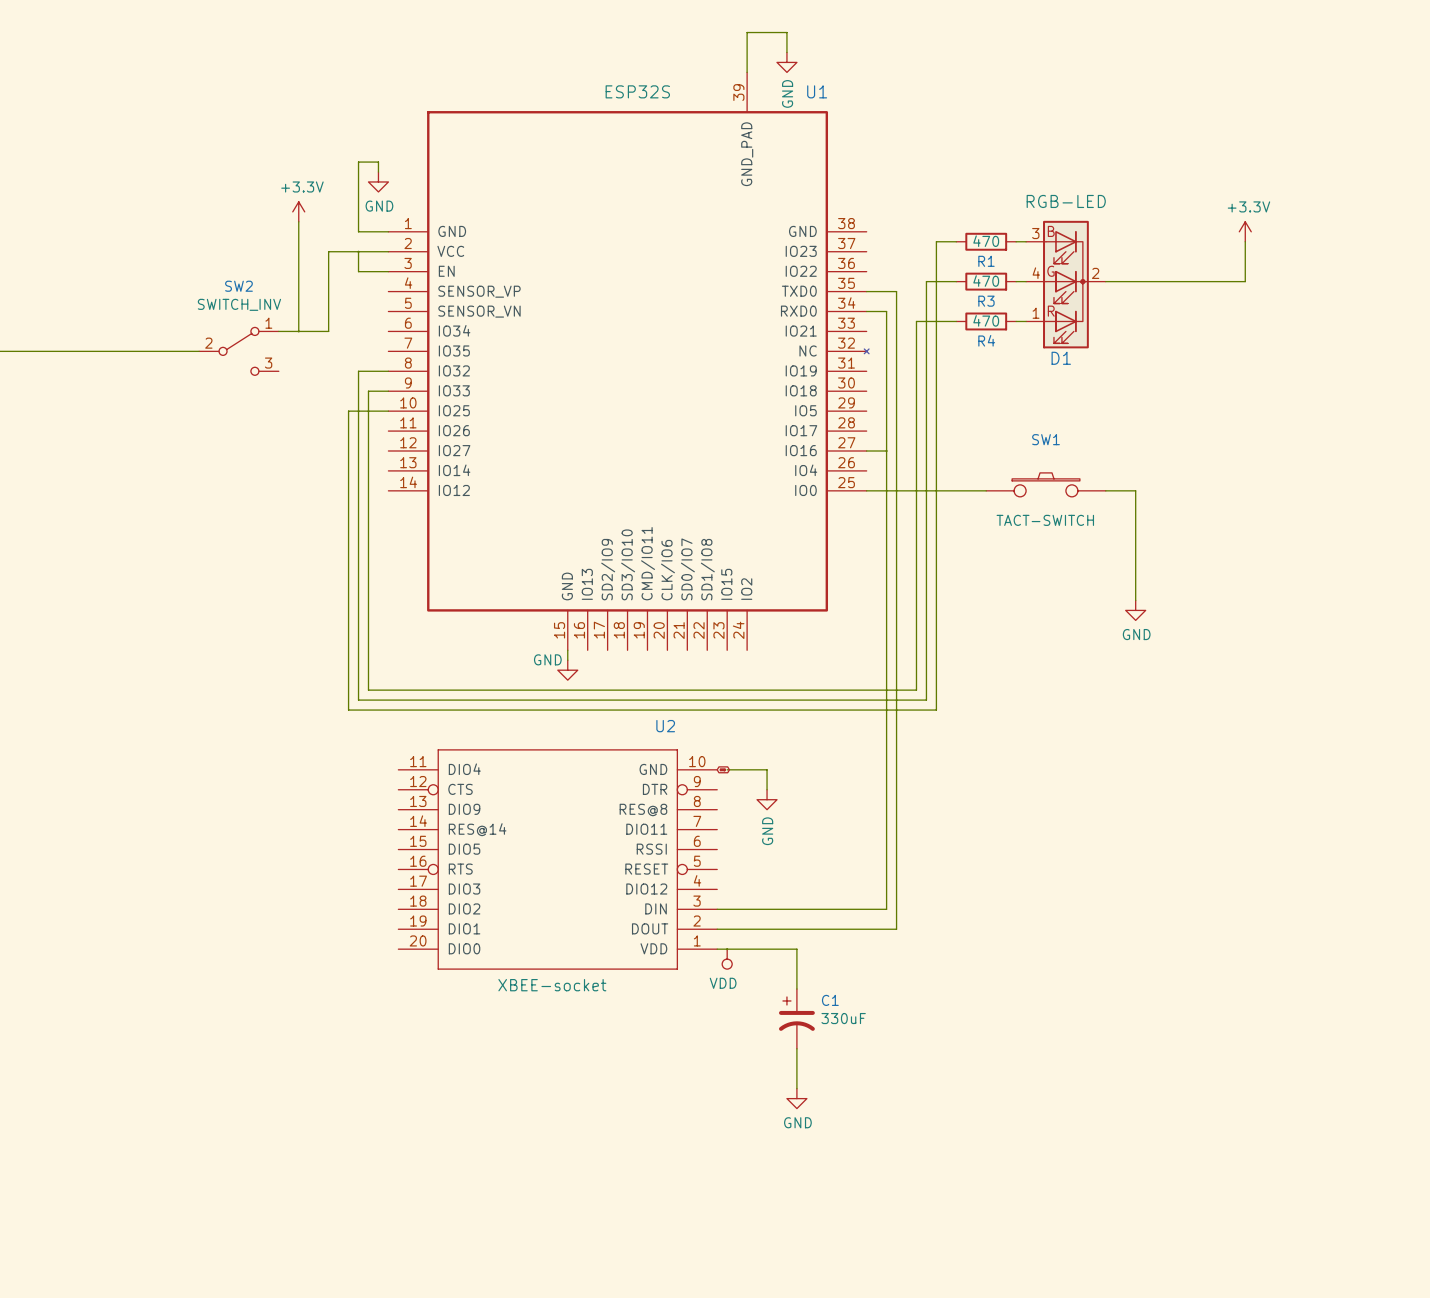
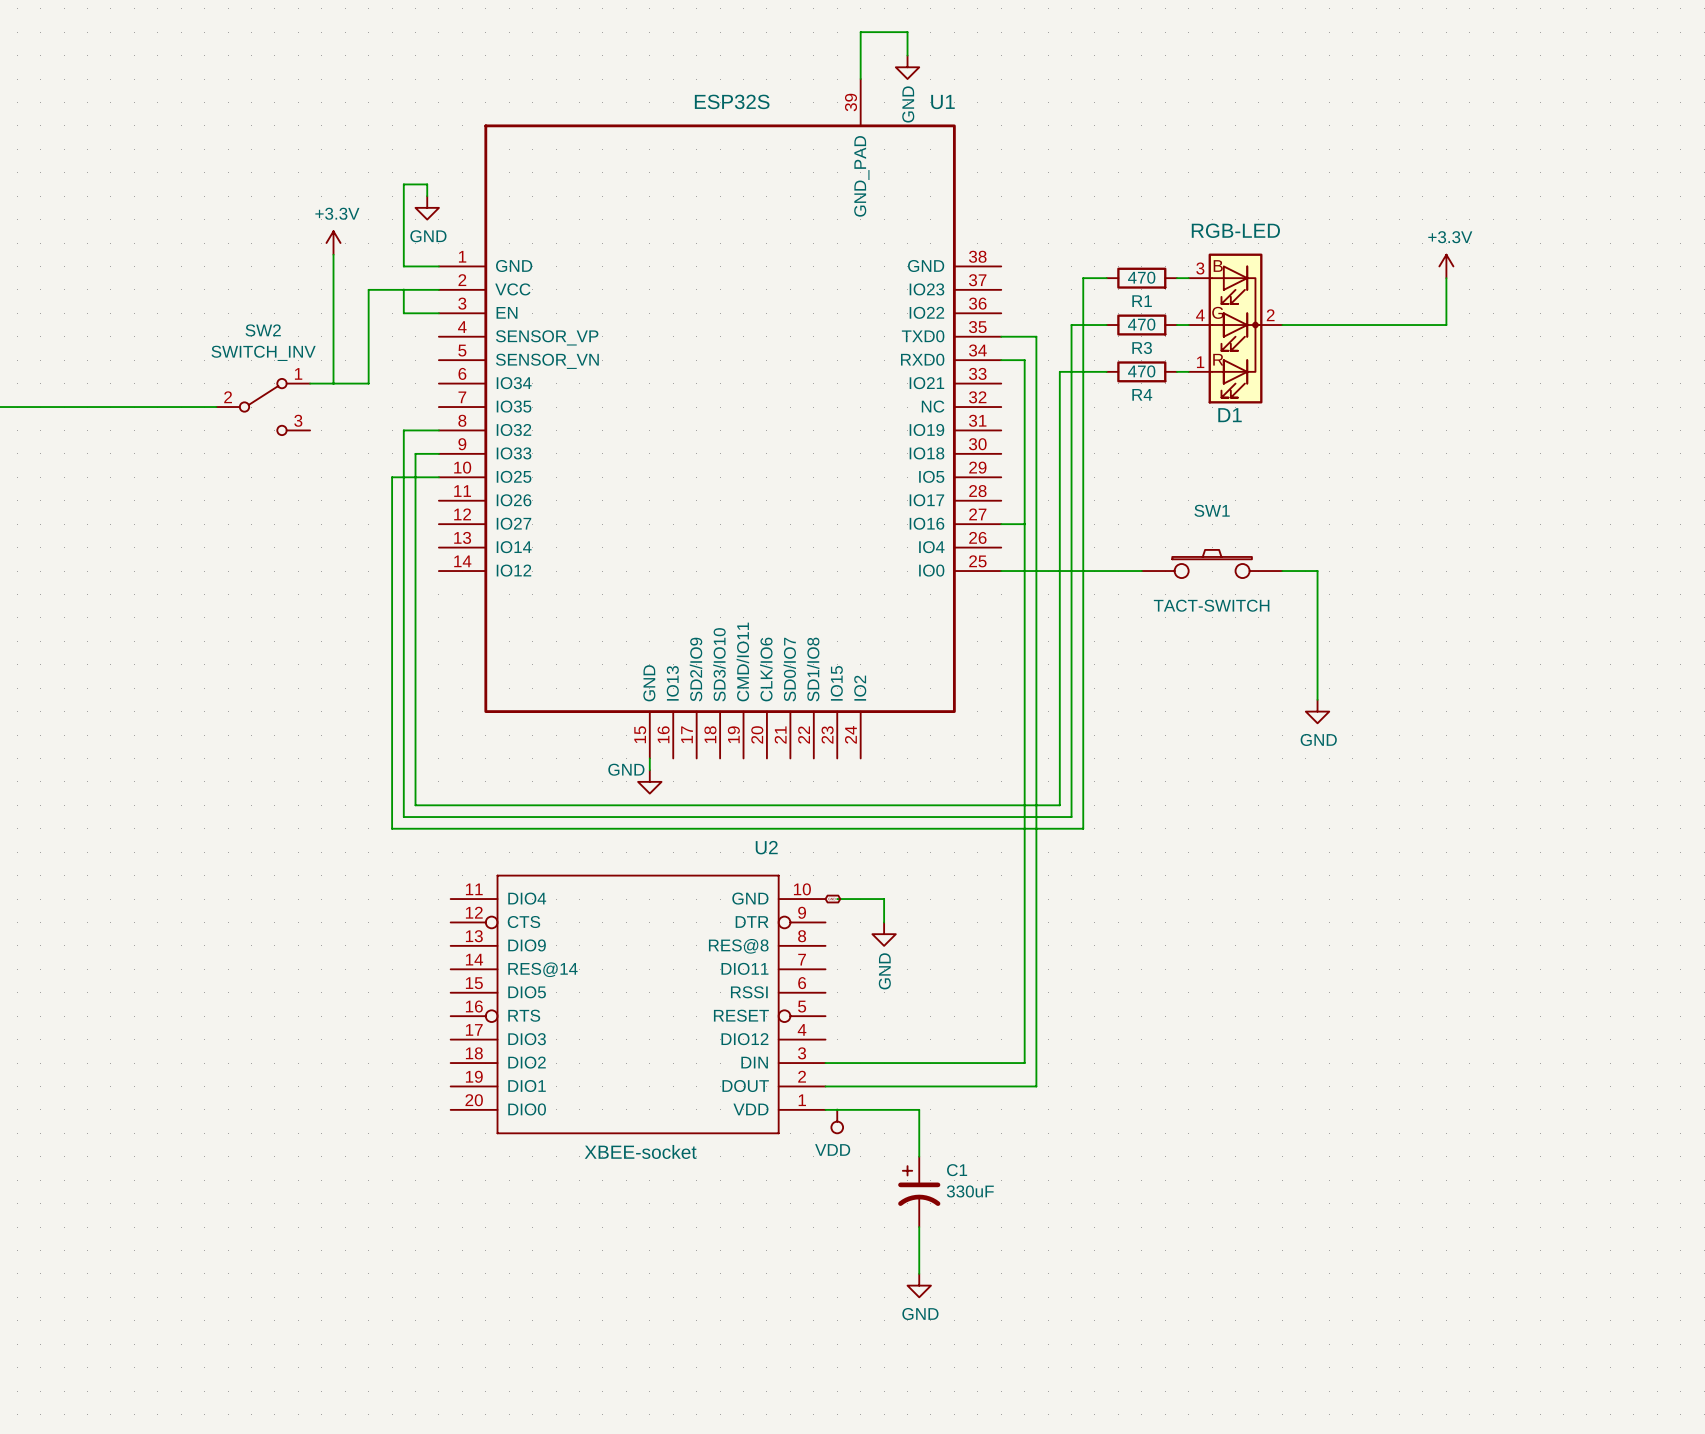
U1 symbol: [388, 72, 870, 651] -> [438, 79, 1002, 759]

